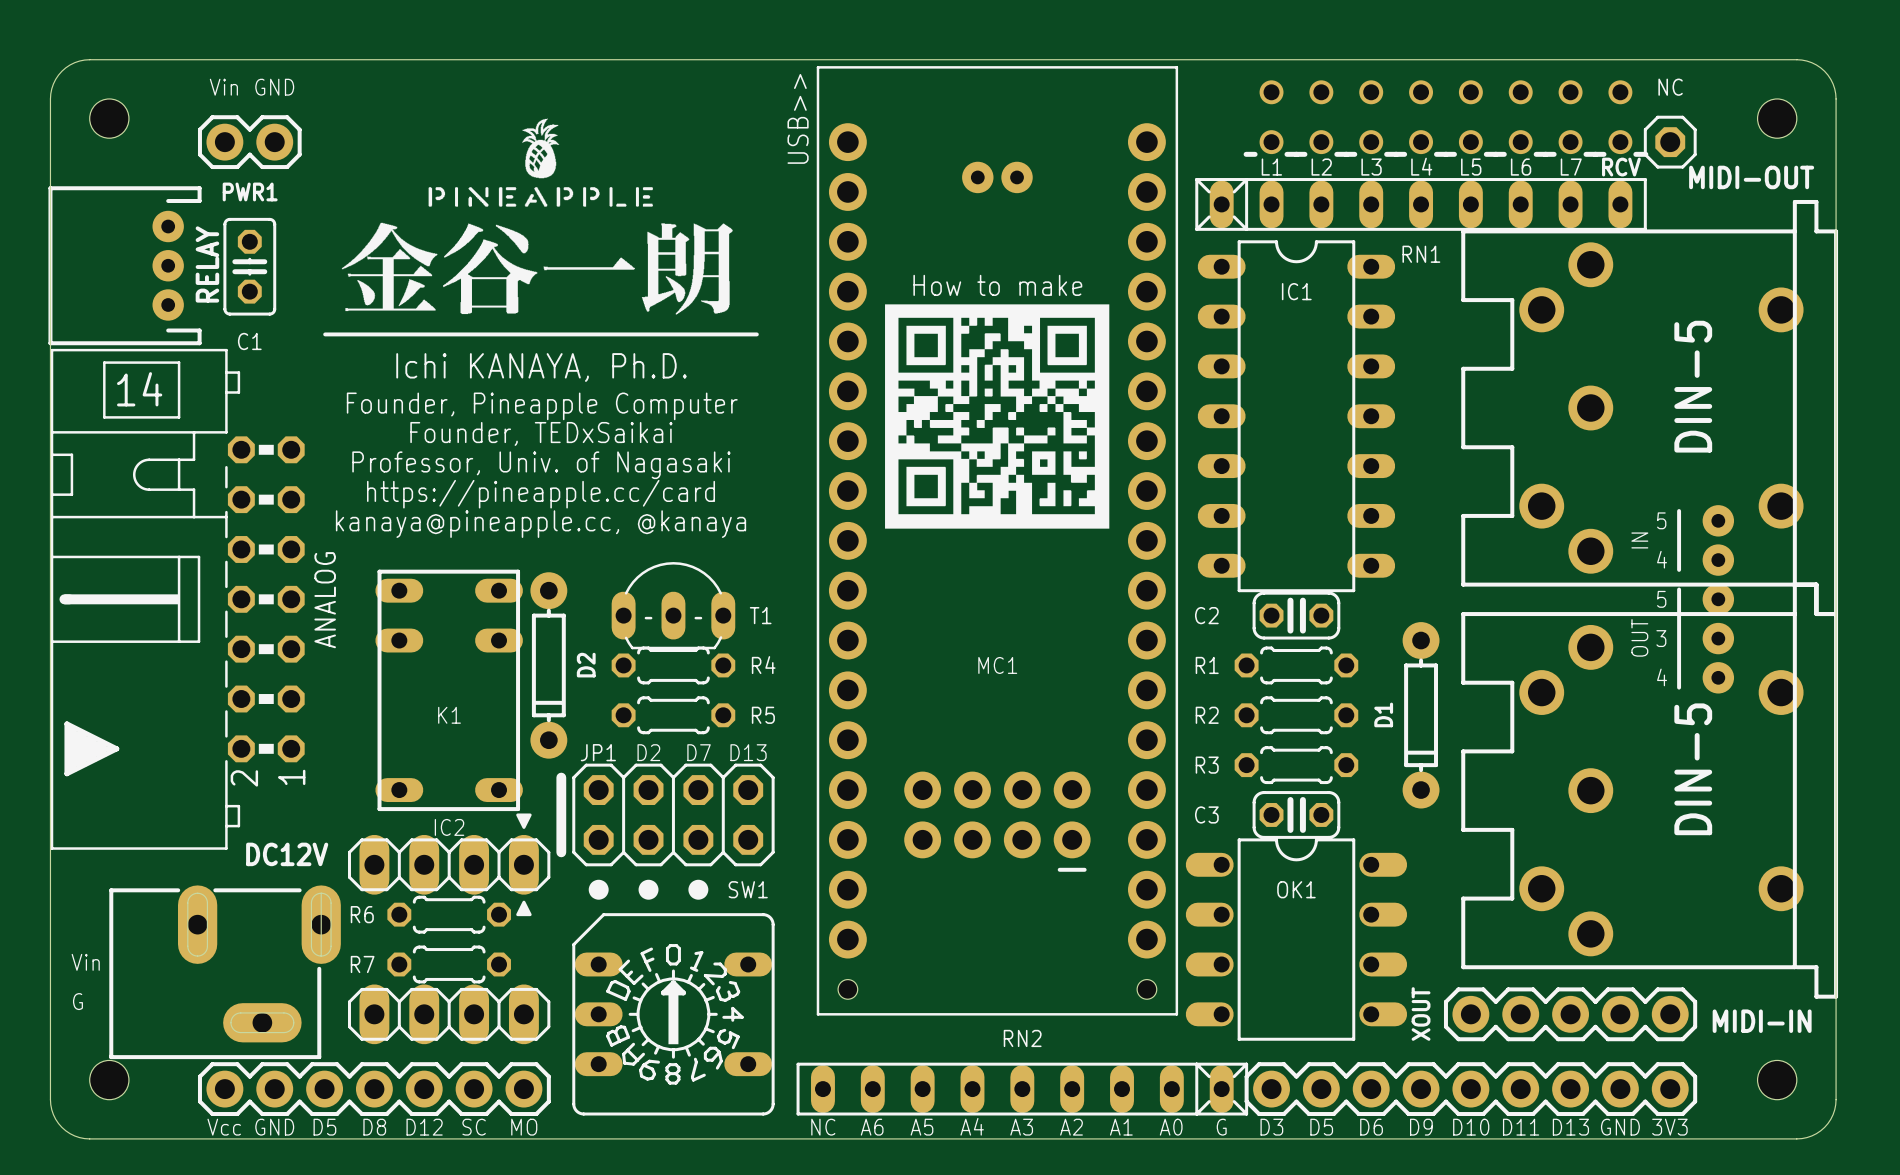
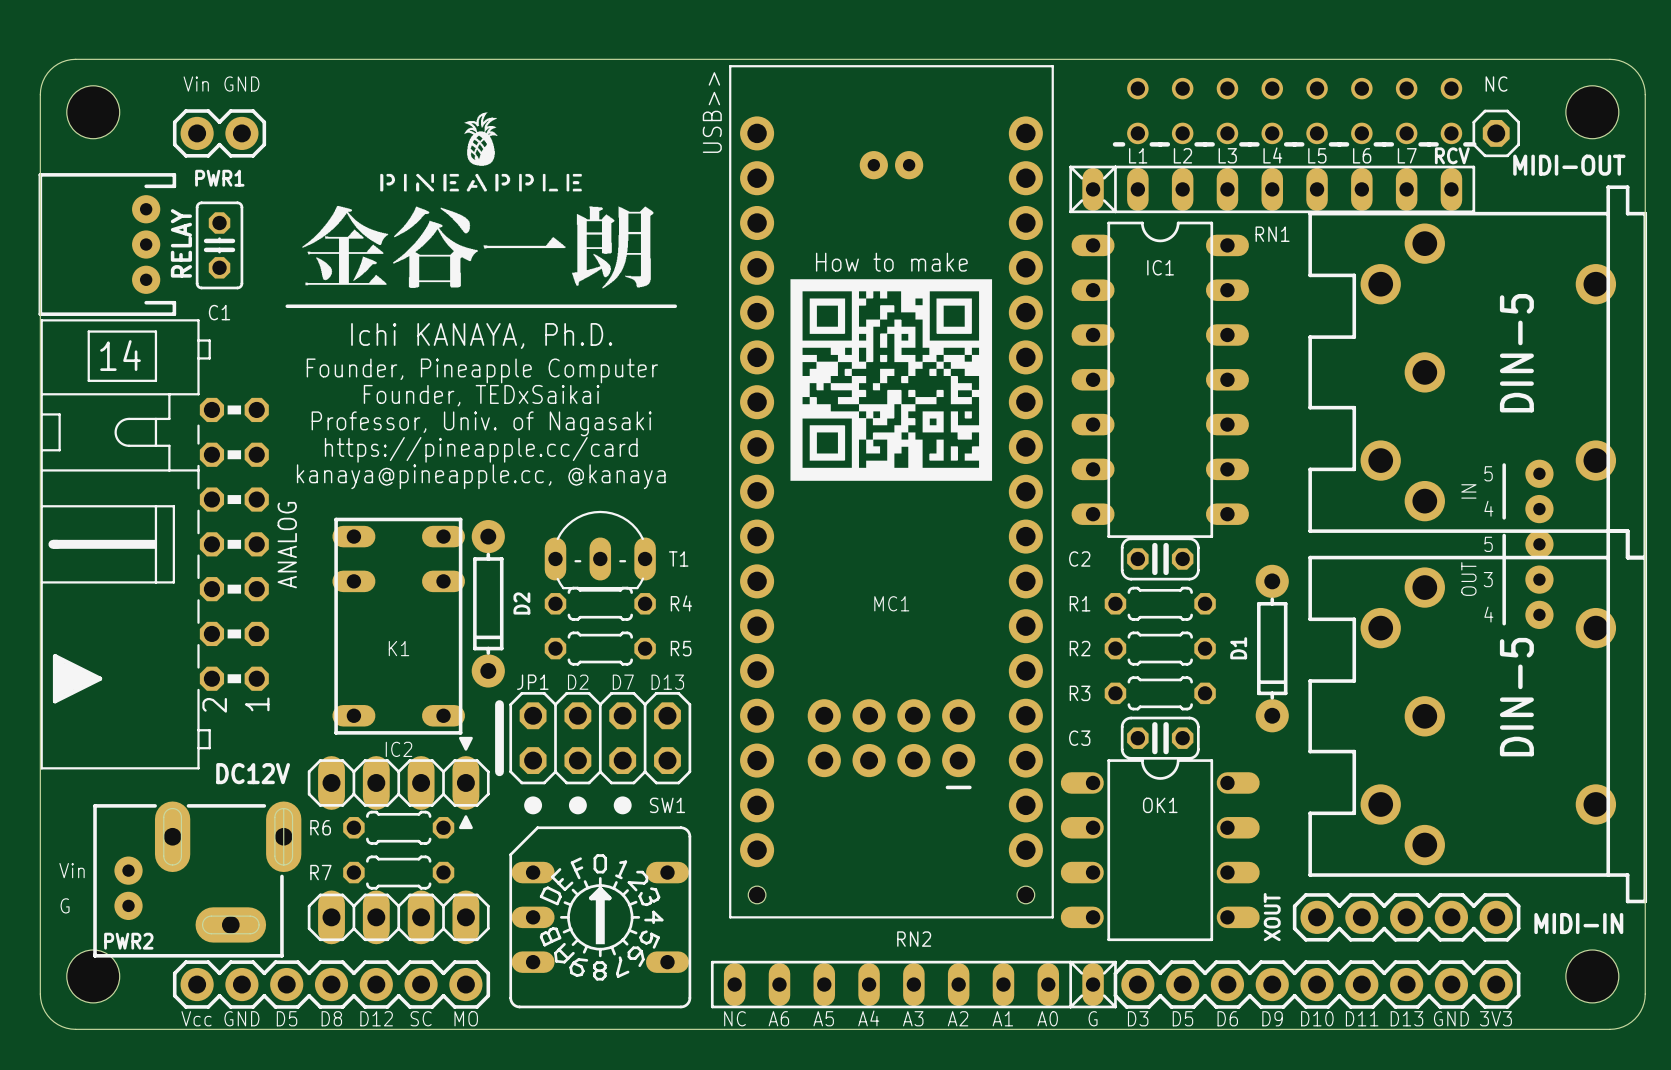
hole size: [89, 98, 129, 139] -> [66, 85, 120, 139]
hole size: [1757, 98, 1797, 139] -> [1565, 85, 1619, 139]
PWR2: none -> (128, 888)
hole size: [89, 1060, 129, 1100] -> [66, 949, 120, 1003]
hole size: [1757, 1060, 1797, 1100] -> [1565, 949, 1619, 1003]

